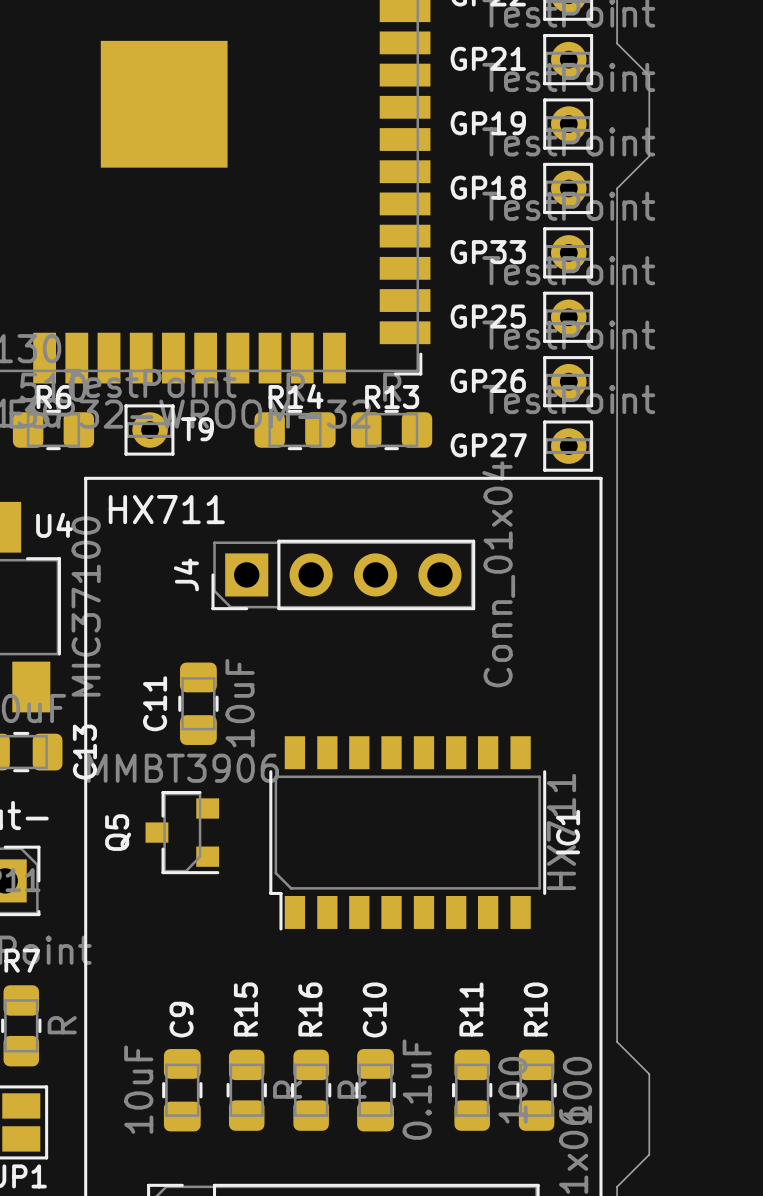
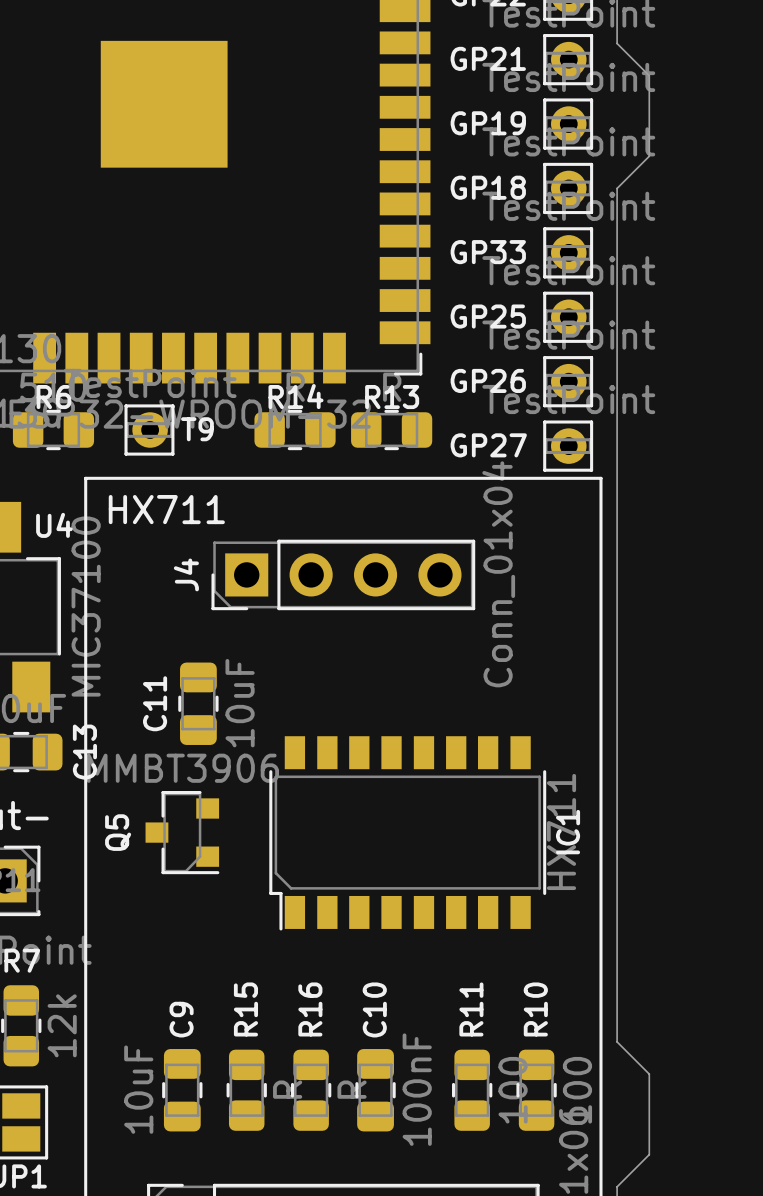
R7 value: R (62, 1025) -> 12k (62, 1025)
C10 value: 0.1uF (417, 1089) -> 100nF (417, 1089)

